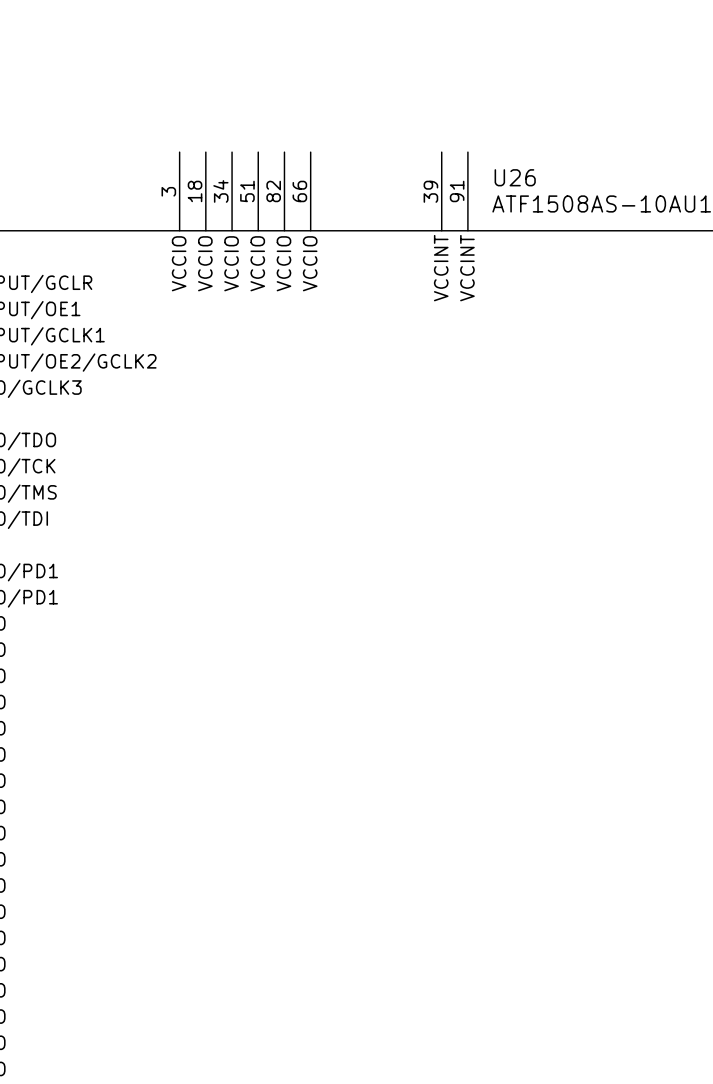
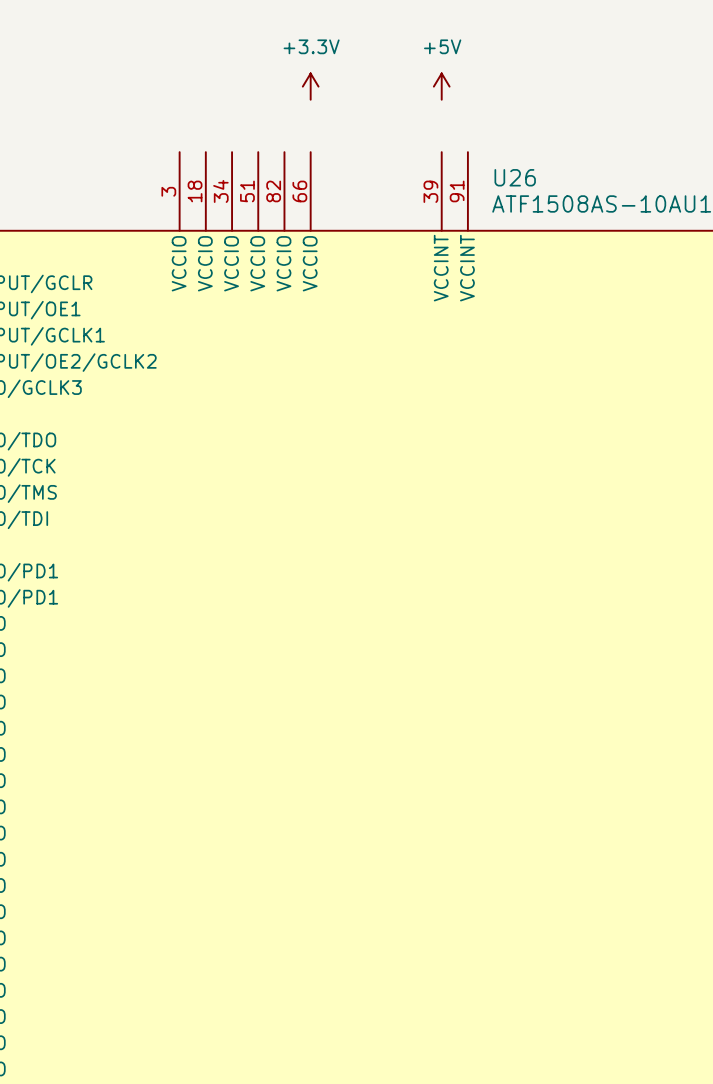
power symbol: none -> +3.3V (310, 86)
power symbol: none -> +5V (441, 86)

